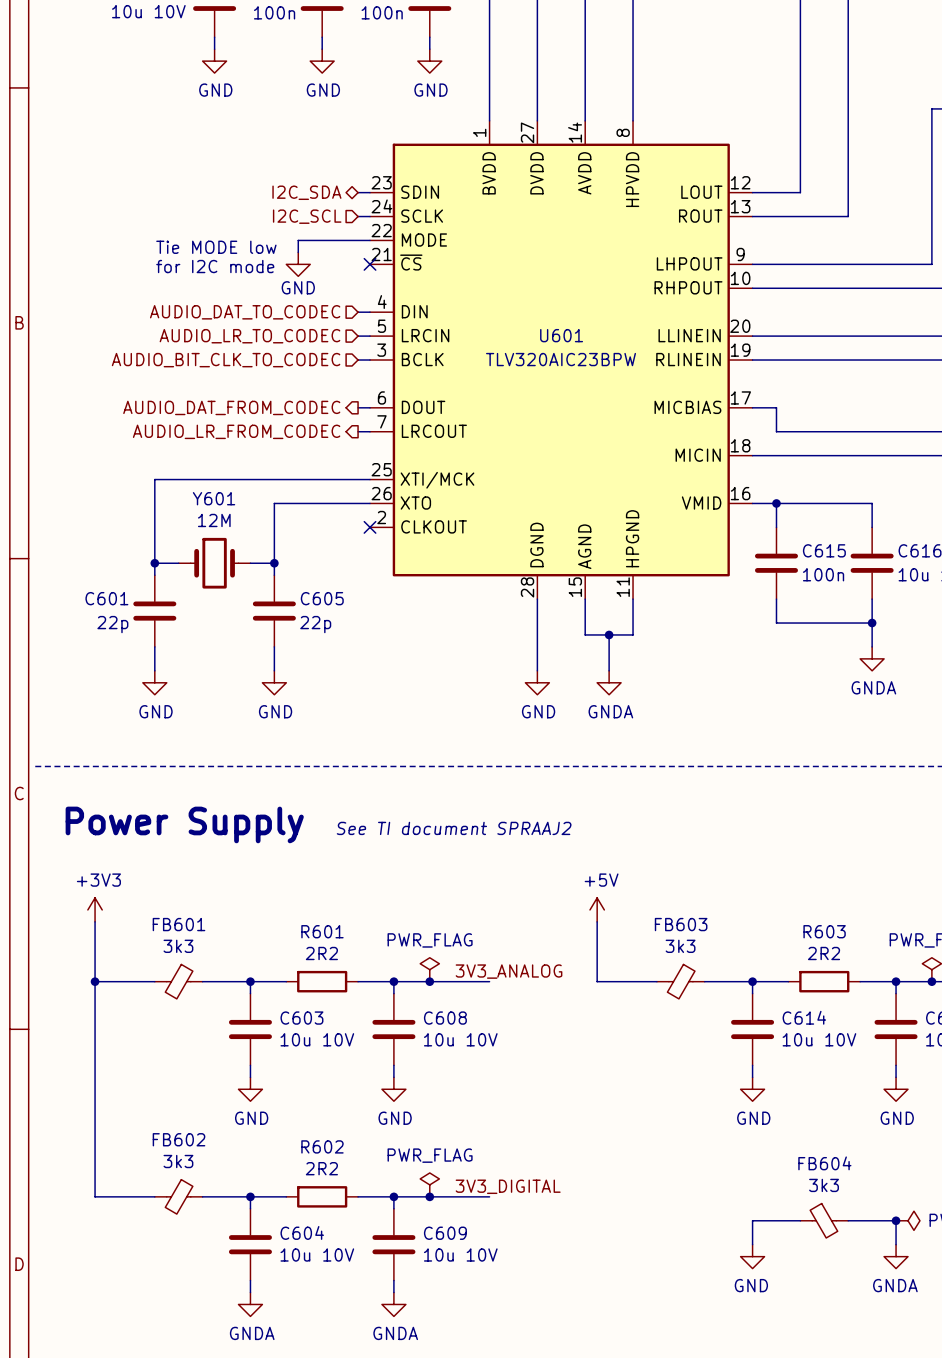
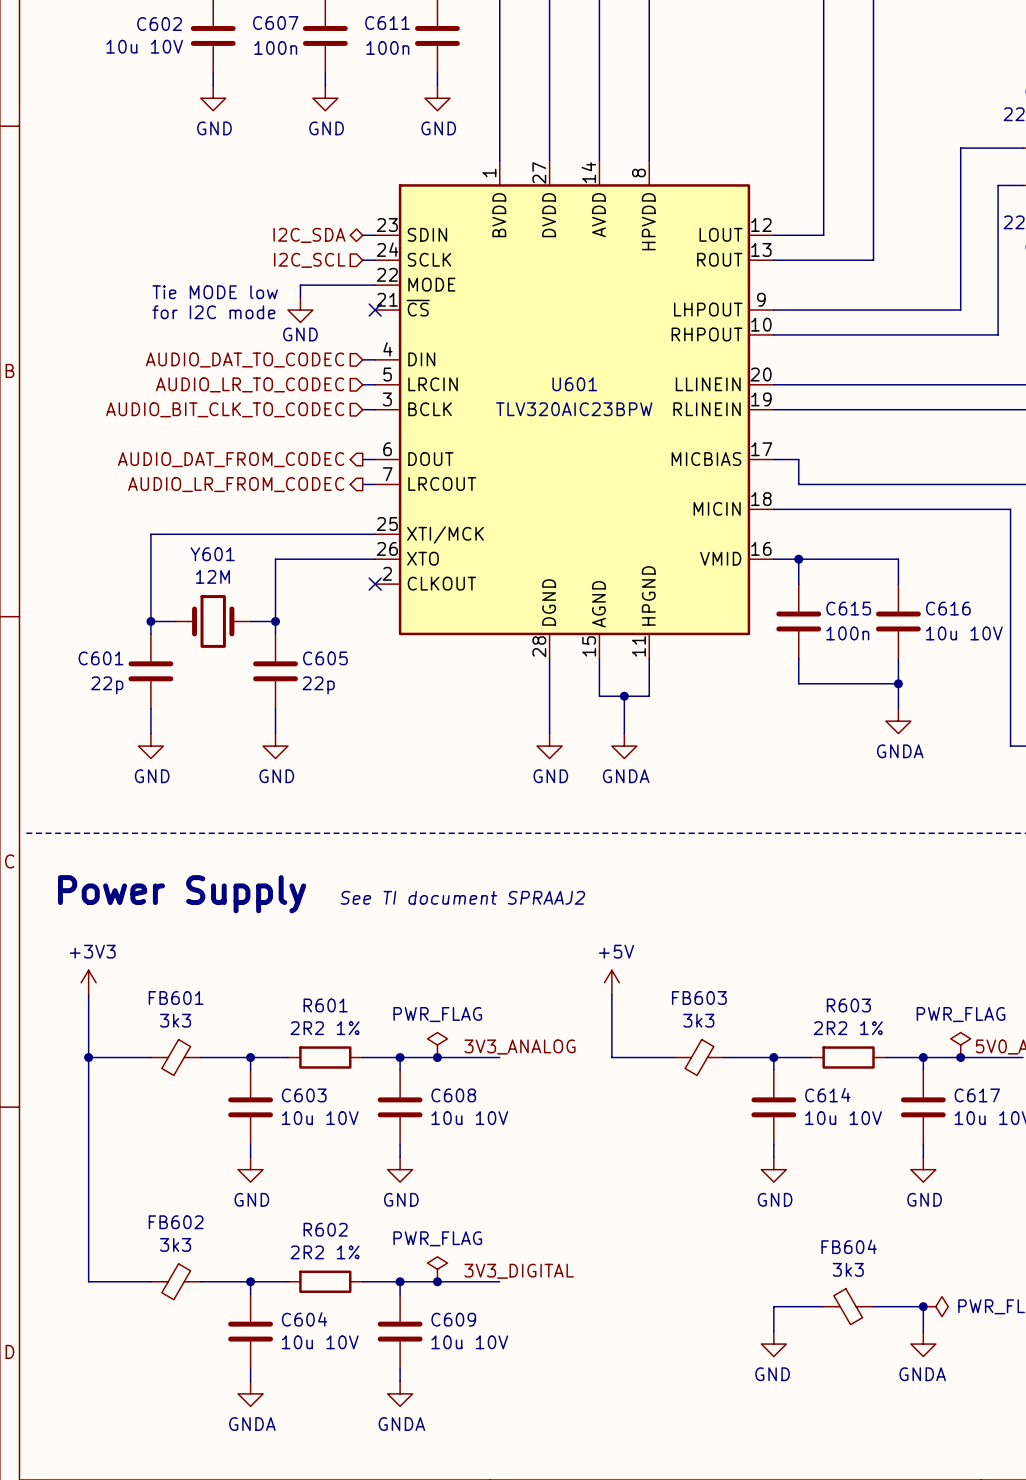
R601 value: 2R2 (321, 953) -> 2R2 1% (325, 1028)
R603 value: 2R2 (824, 953) -> 2R2 1% (848, 1028)
R602 value: 2R2 (321, 1168) -> 2R2 1% (325, 1252)

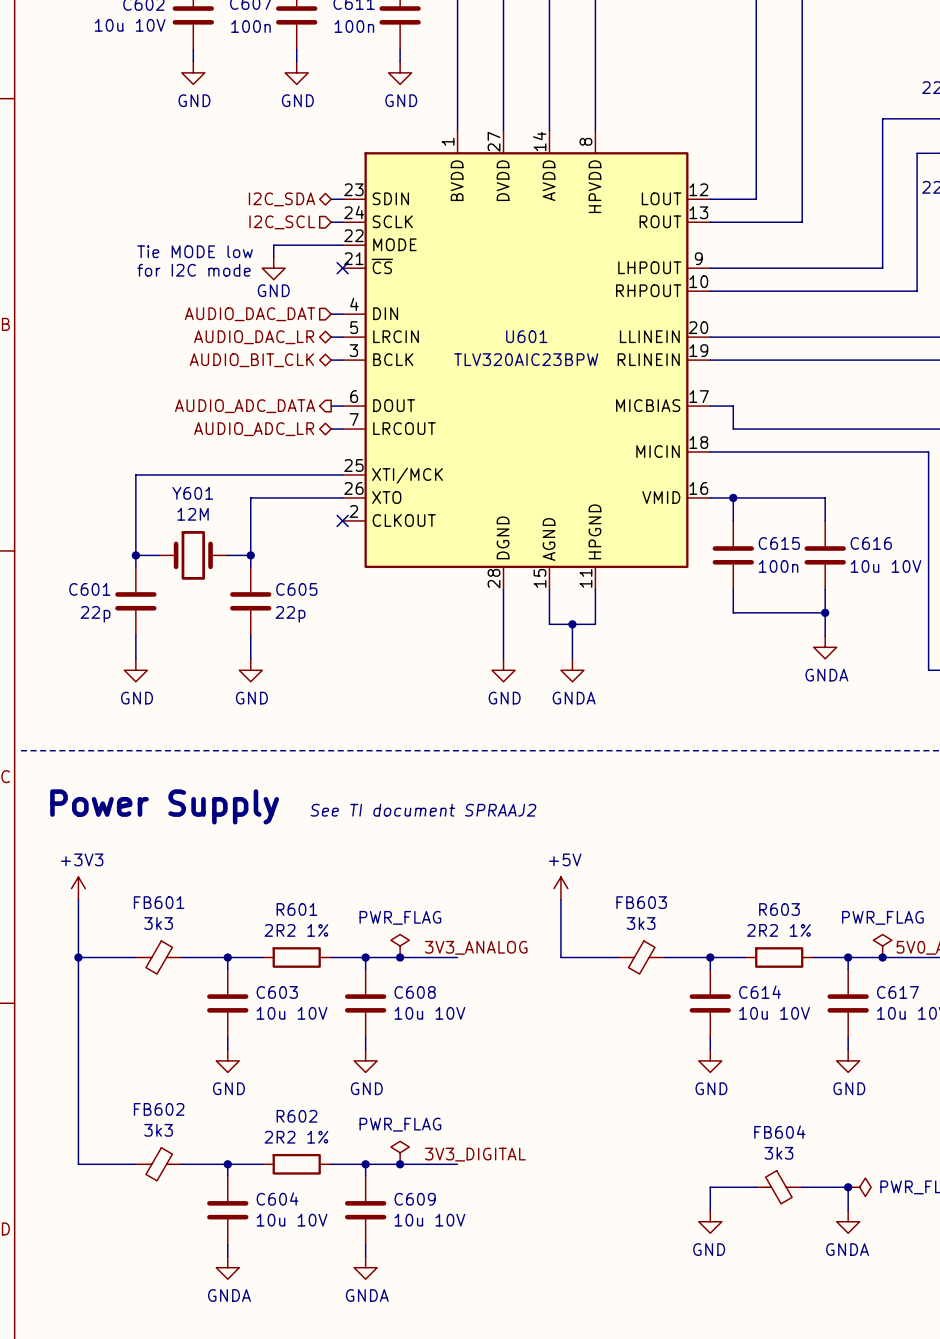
hierarchical label: AUDIO_DAT_TO_CODEC (245, 359) -> AUDIO_DAC_DAT (250, 314)
hierarchical label shape: input (250, 384) -> bidirectional (254, 337)
hierarchical label: AUDIO_LR_TO_CODEC (250, 384) -> AUDIO_DAC_LR (254, 337)
hierarchical label shape: input (225, 409) -> bidirectional (251, 360)
hierarchical label: AUDIO_BIT_CLK_TO_CODEC (225, 409) -> AUDIO_BIT_CLK (251, 360)
hierarchical label: AUDIO_DAT_FROM_CODEC (231, 459) -> AUDIO_ADC_DATA (245, 406)
hierarchical label shape: output (236, 484) -> bidirectional (254, 429)
hierarchical label: AUDIO_LR_FROM_CODEC (236, 484) -> AUDIO_ADC_LR (254, 429)

